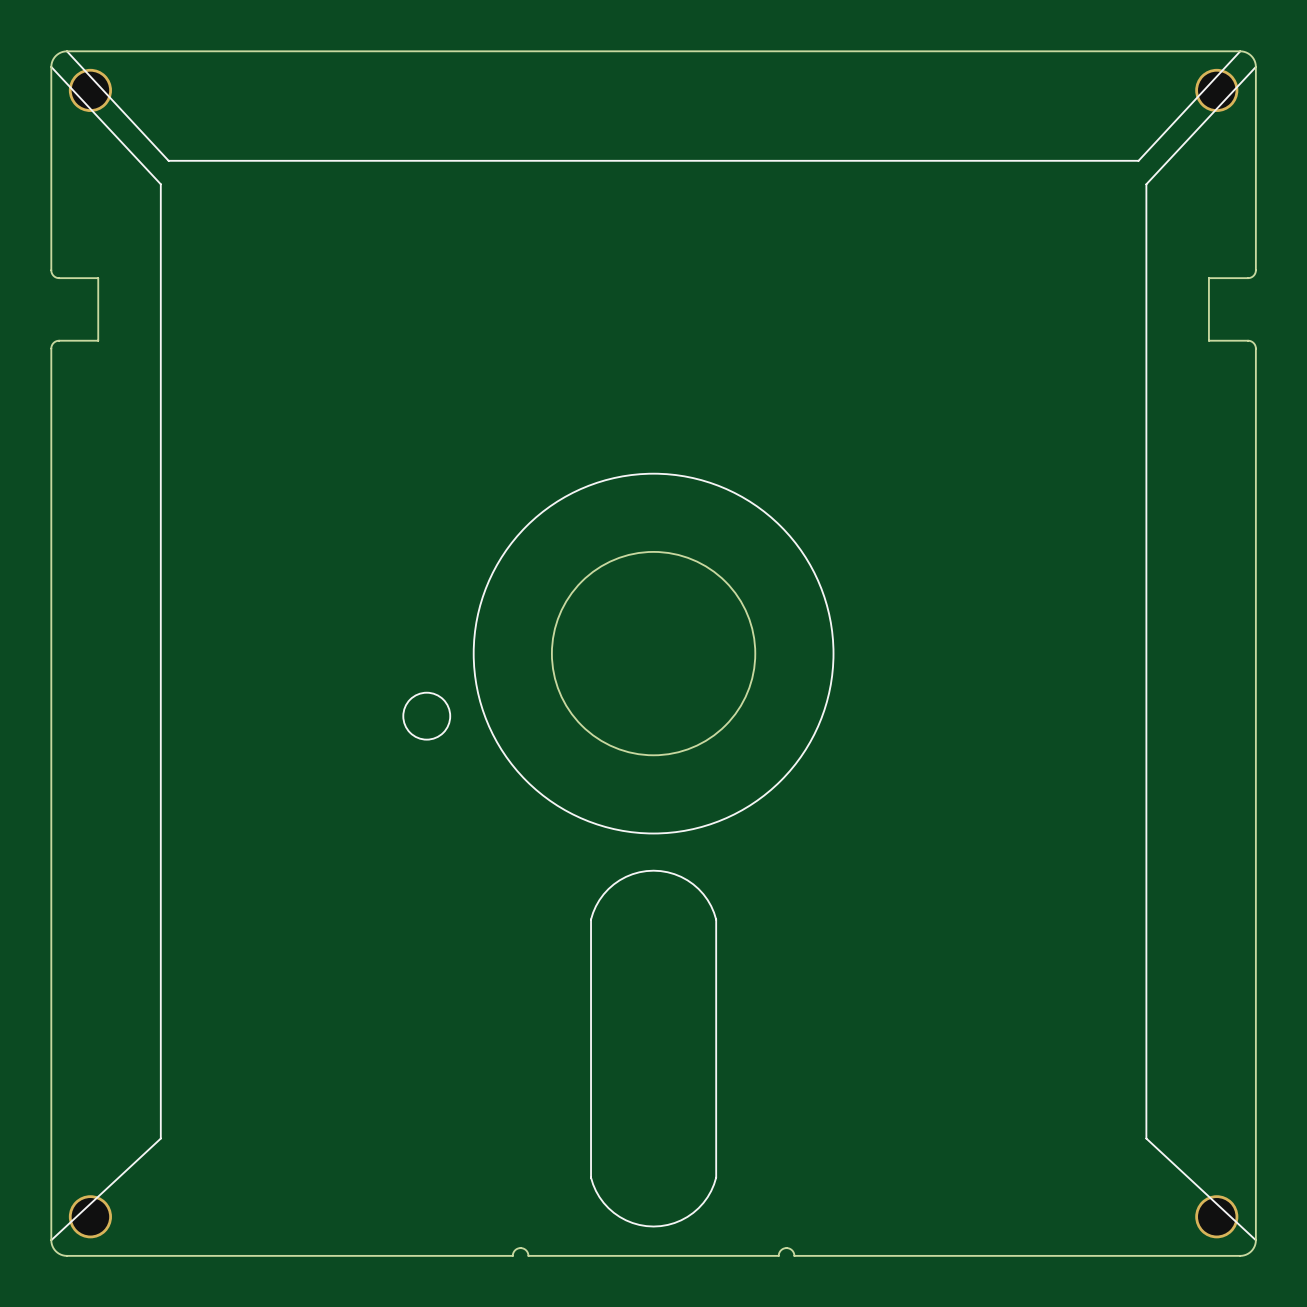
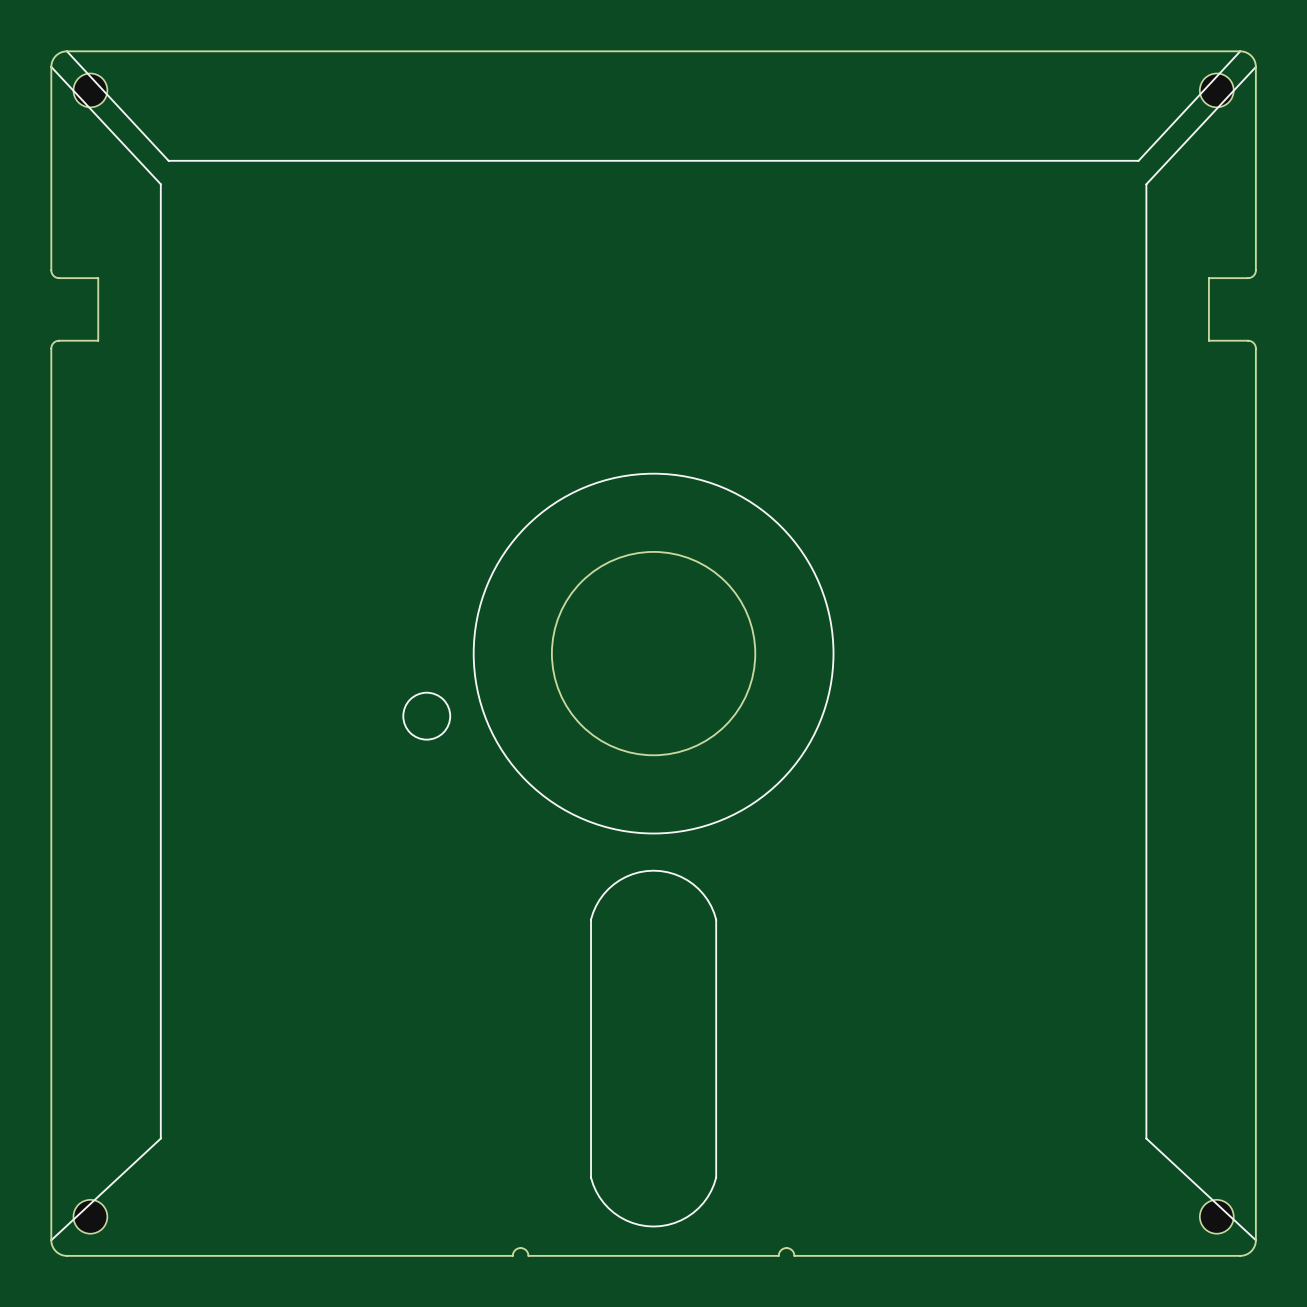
part footprint: [68, 68, 112, 112] -> [73, 73, 108, 108]
part footprint: [1195, 68, 1239, 112] -> [1199, 73, 1234, 108]
part footprint: [68, 1195, 112, 1239] -> [73, 1199, 108, 1234]
part footprint: [1195, 1195, 1239, 1239] -> [1199, 1199, 1234, 1234]

